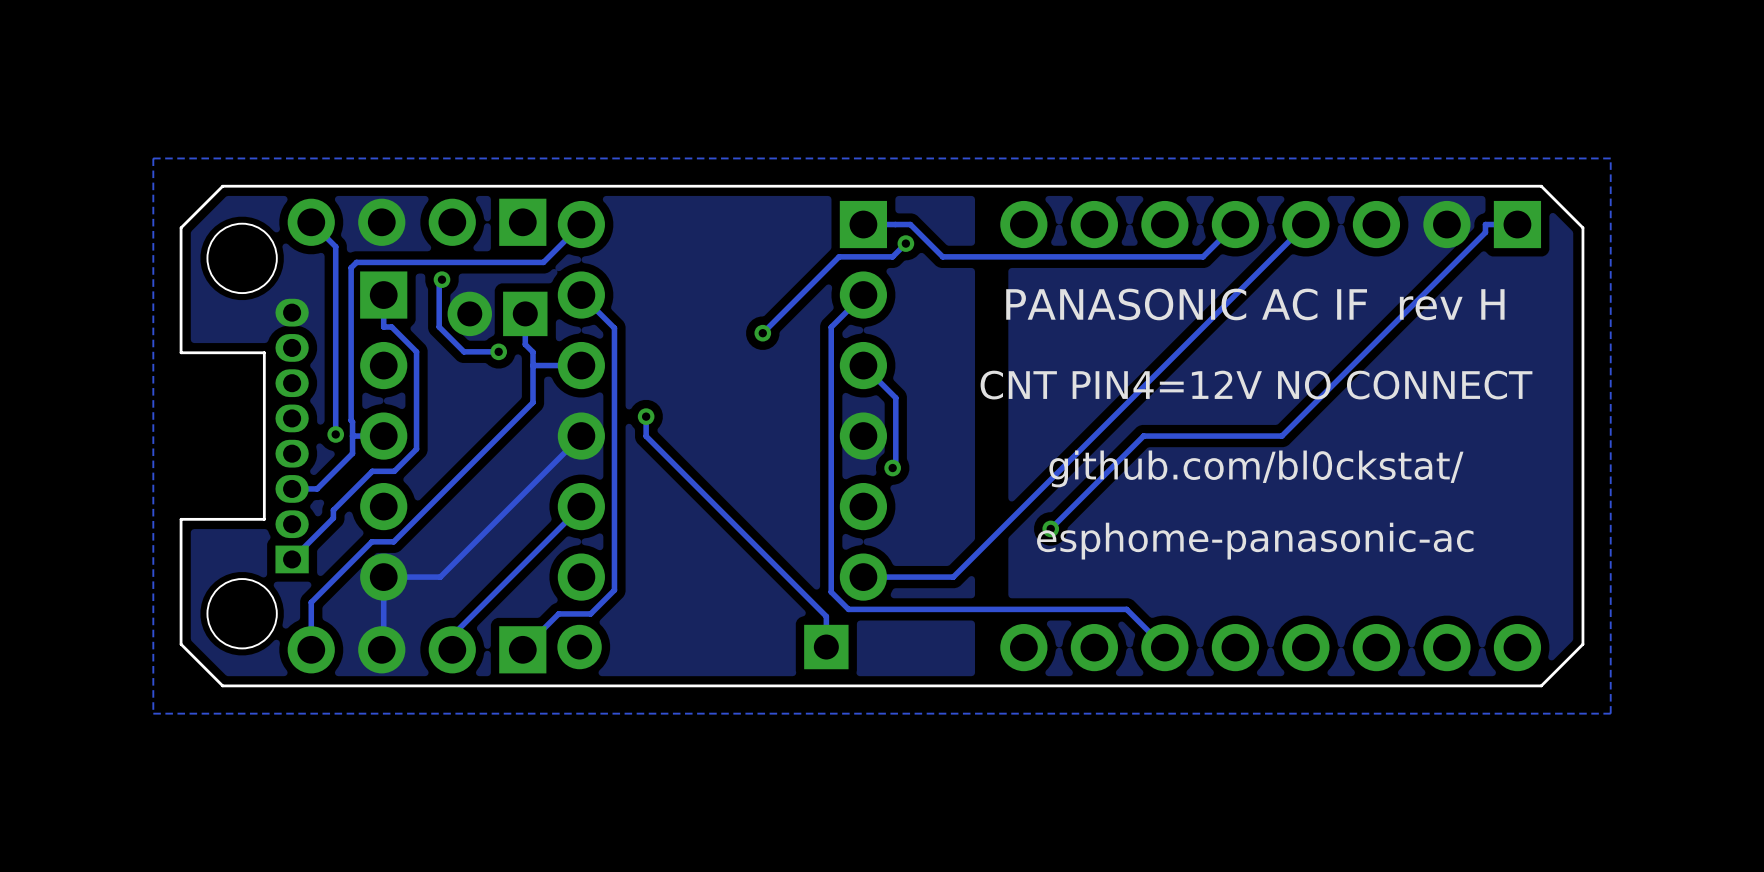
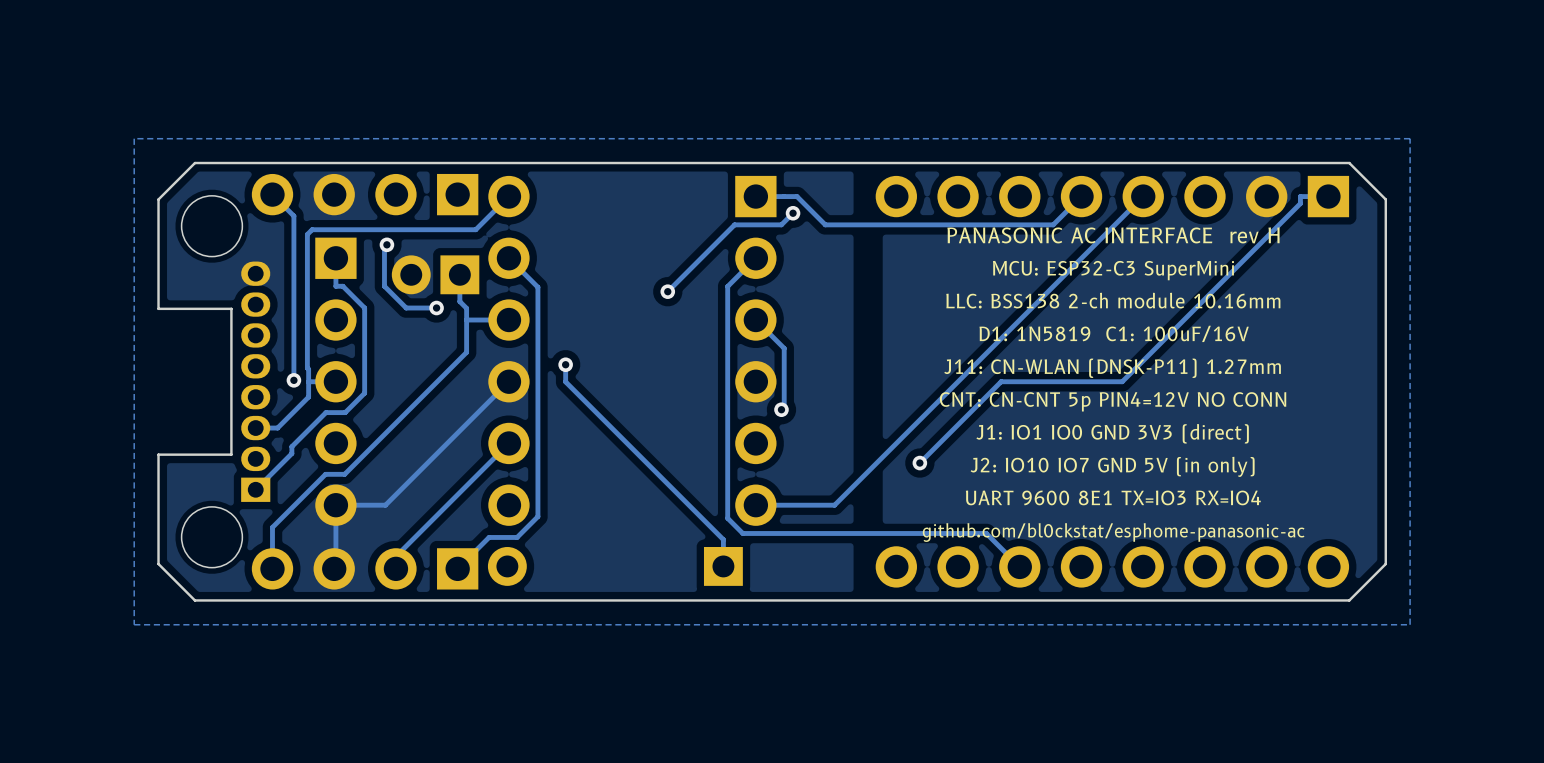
text: none -> PANASONIC AC INTERFACE rev H (1113, 235)
text: PANASONIC AC IF rev H (1255, 304) -> MCU: ESP32-C3 SuperMini (1113, 270)
text: none -> LLC: BSS138 2-ch module 10.16mm (1113, 300)
text: CNT PIN4=12V NO CONNECT (1256, 385) -> D1: 1N5819 C1: 100uF/16V (1114, 333)
text: none -> J11: CN-WLAN (DNSK-P11) 1.27mm (1112, 368)
text: none -> CNT: CN-CNT 5p PIN4=12V NO CONN (1113, 401)
text: github.com/bl0ckstat/ (1256, 468) -> none
text: none -> J1: IO1 IO0 GND 3V3 (direct) (1112, 433)
text: none -> J2: IO10 IO7 GND 5V (in only) (1112, 466)
text: esphome-panasonic-ac (1255, 541) -> none
text: none -> UART 9600 8E1 TX=IO3 RX=IO4 (1113, 497)
text: none -> github.com/bl0ckstat/esphome-panasonic-ac (1113, 532)

